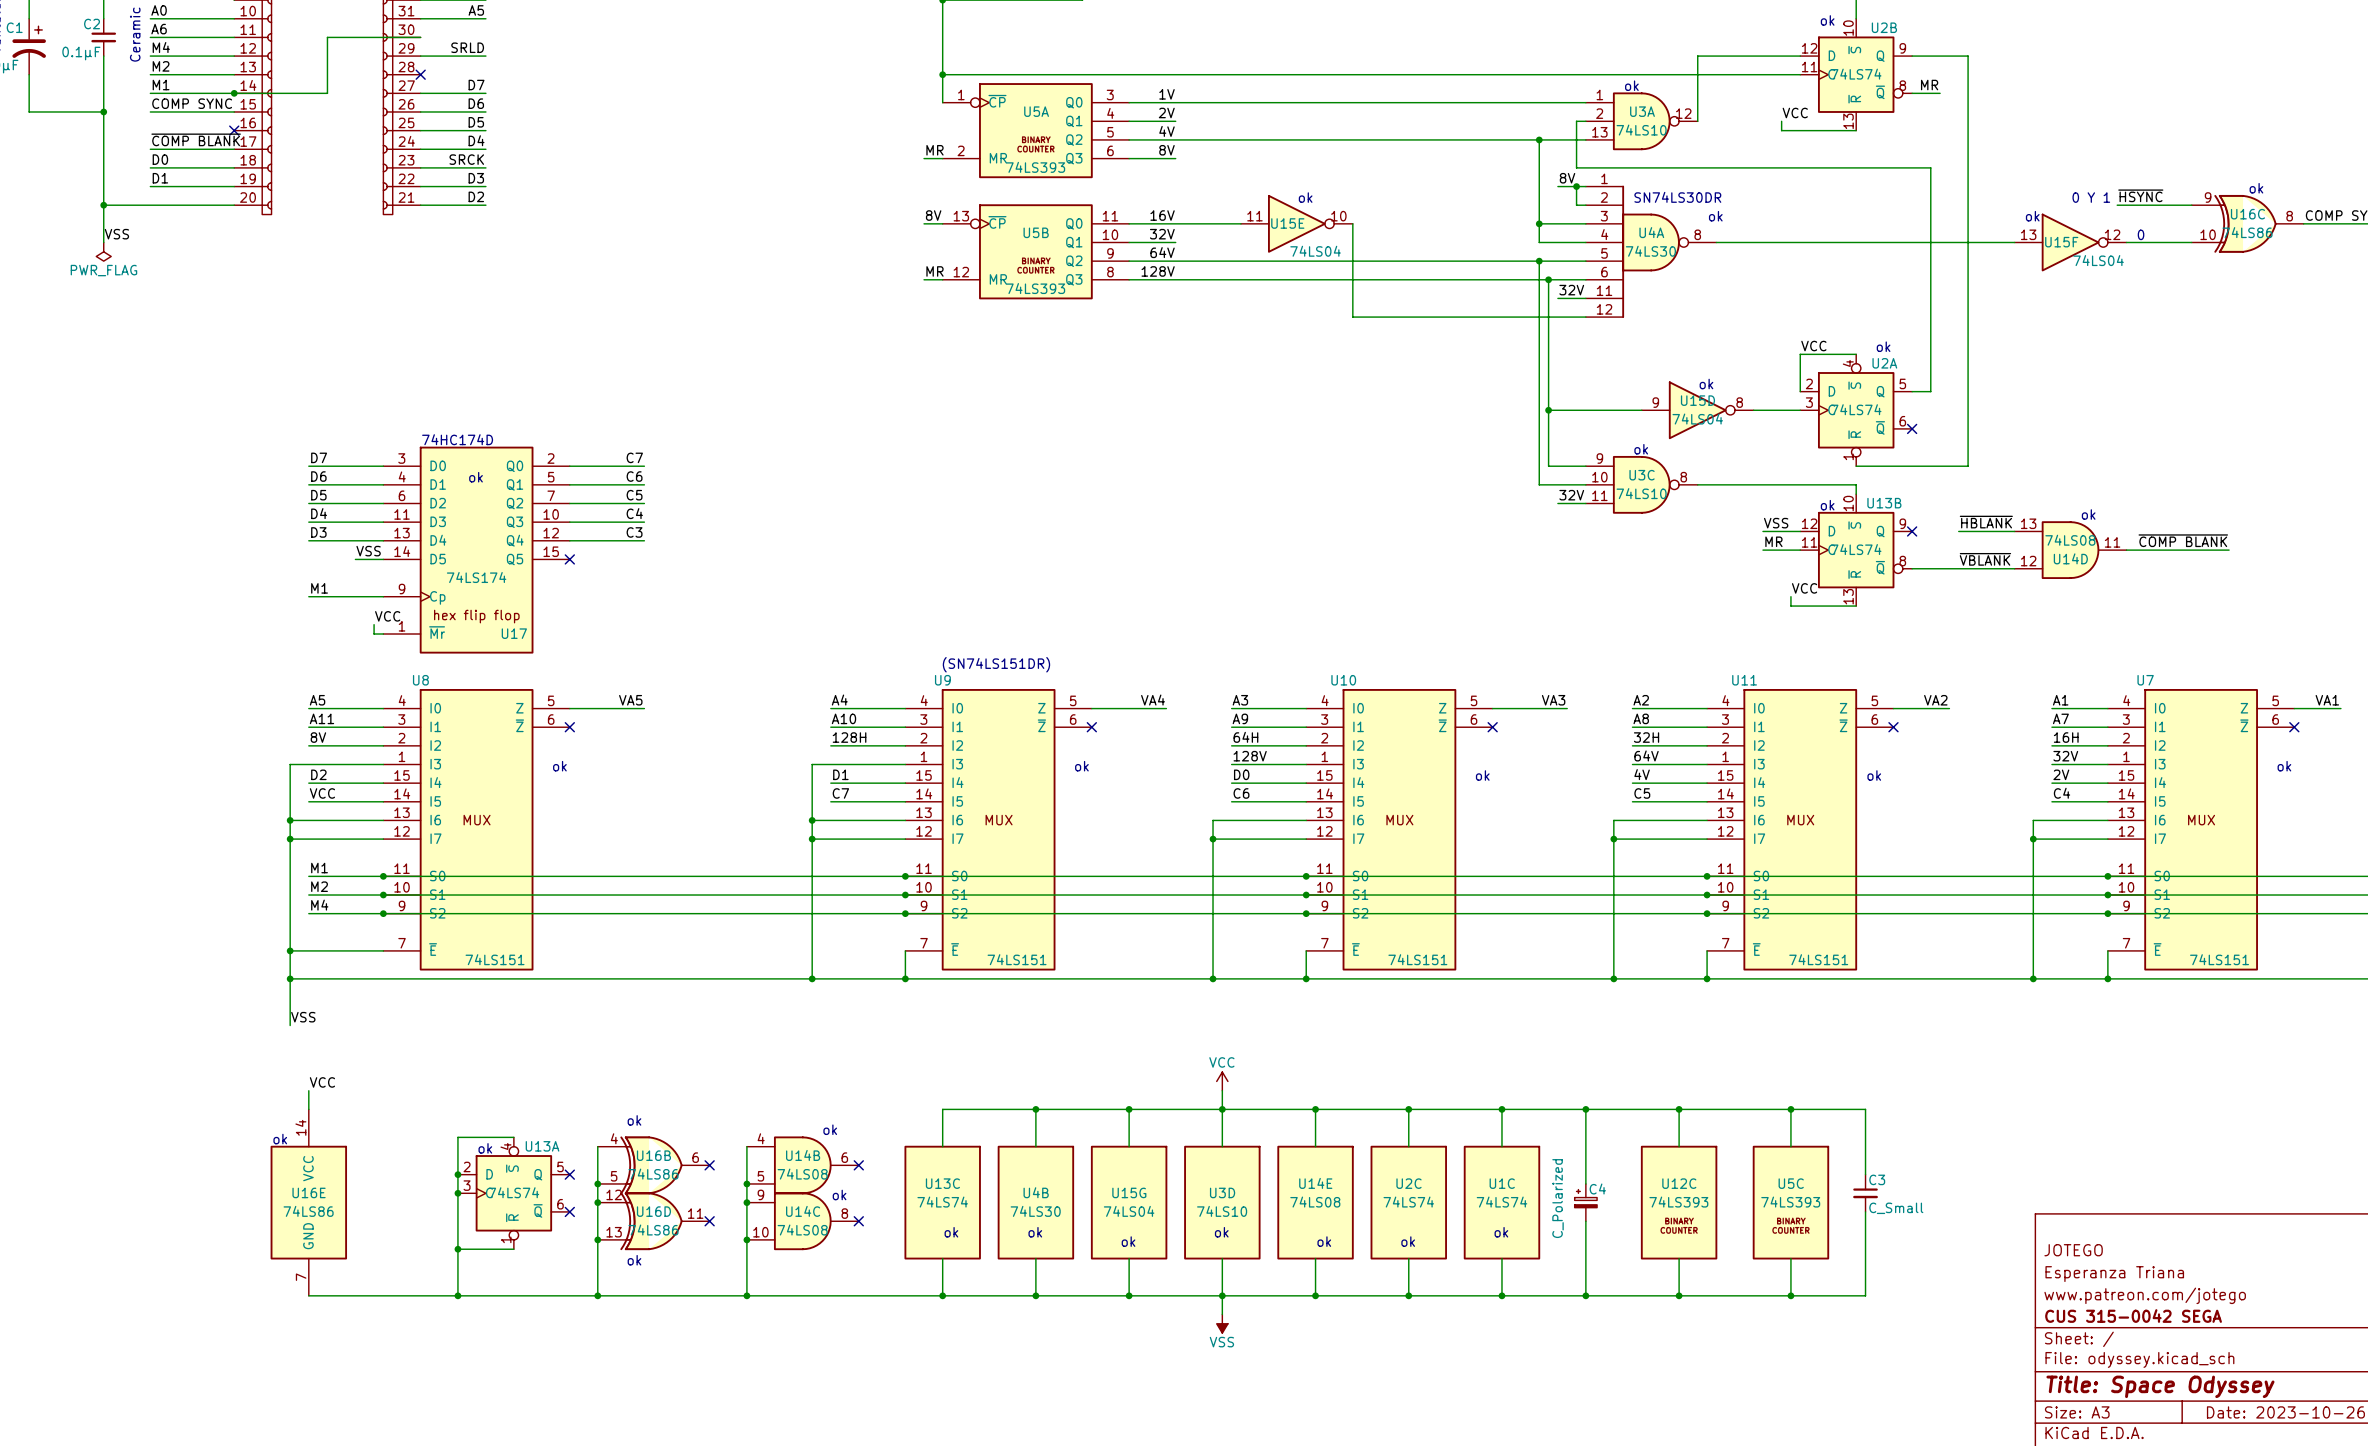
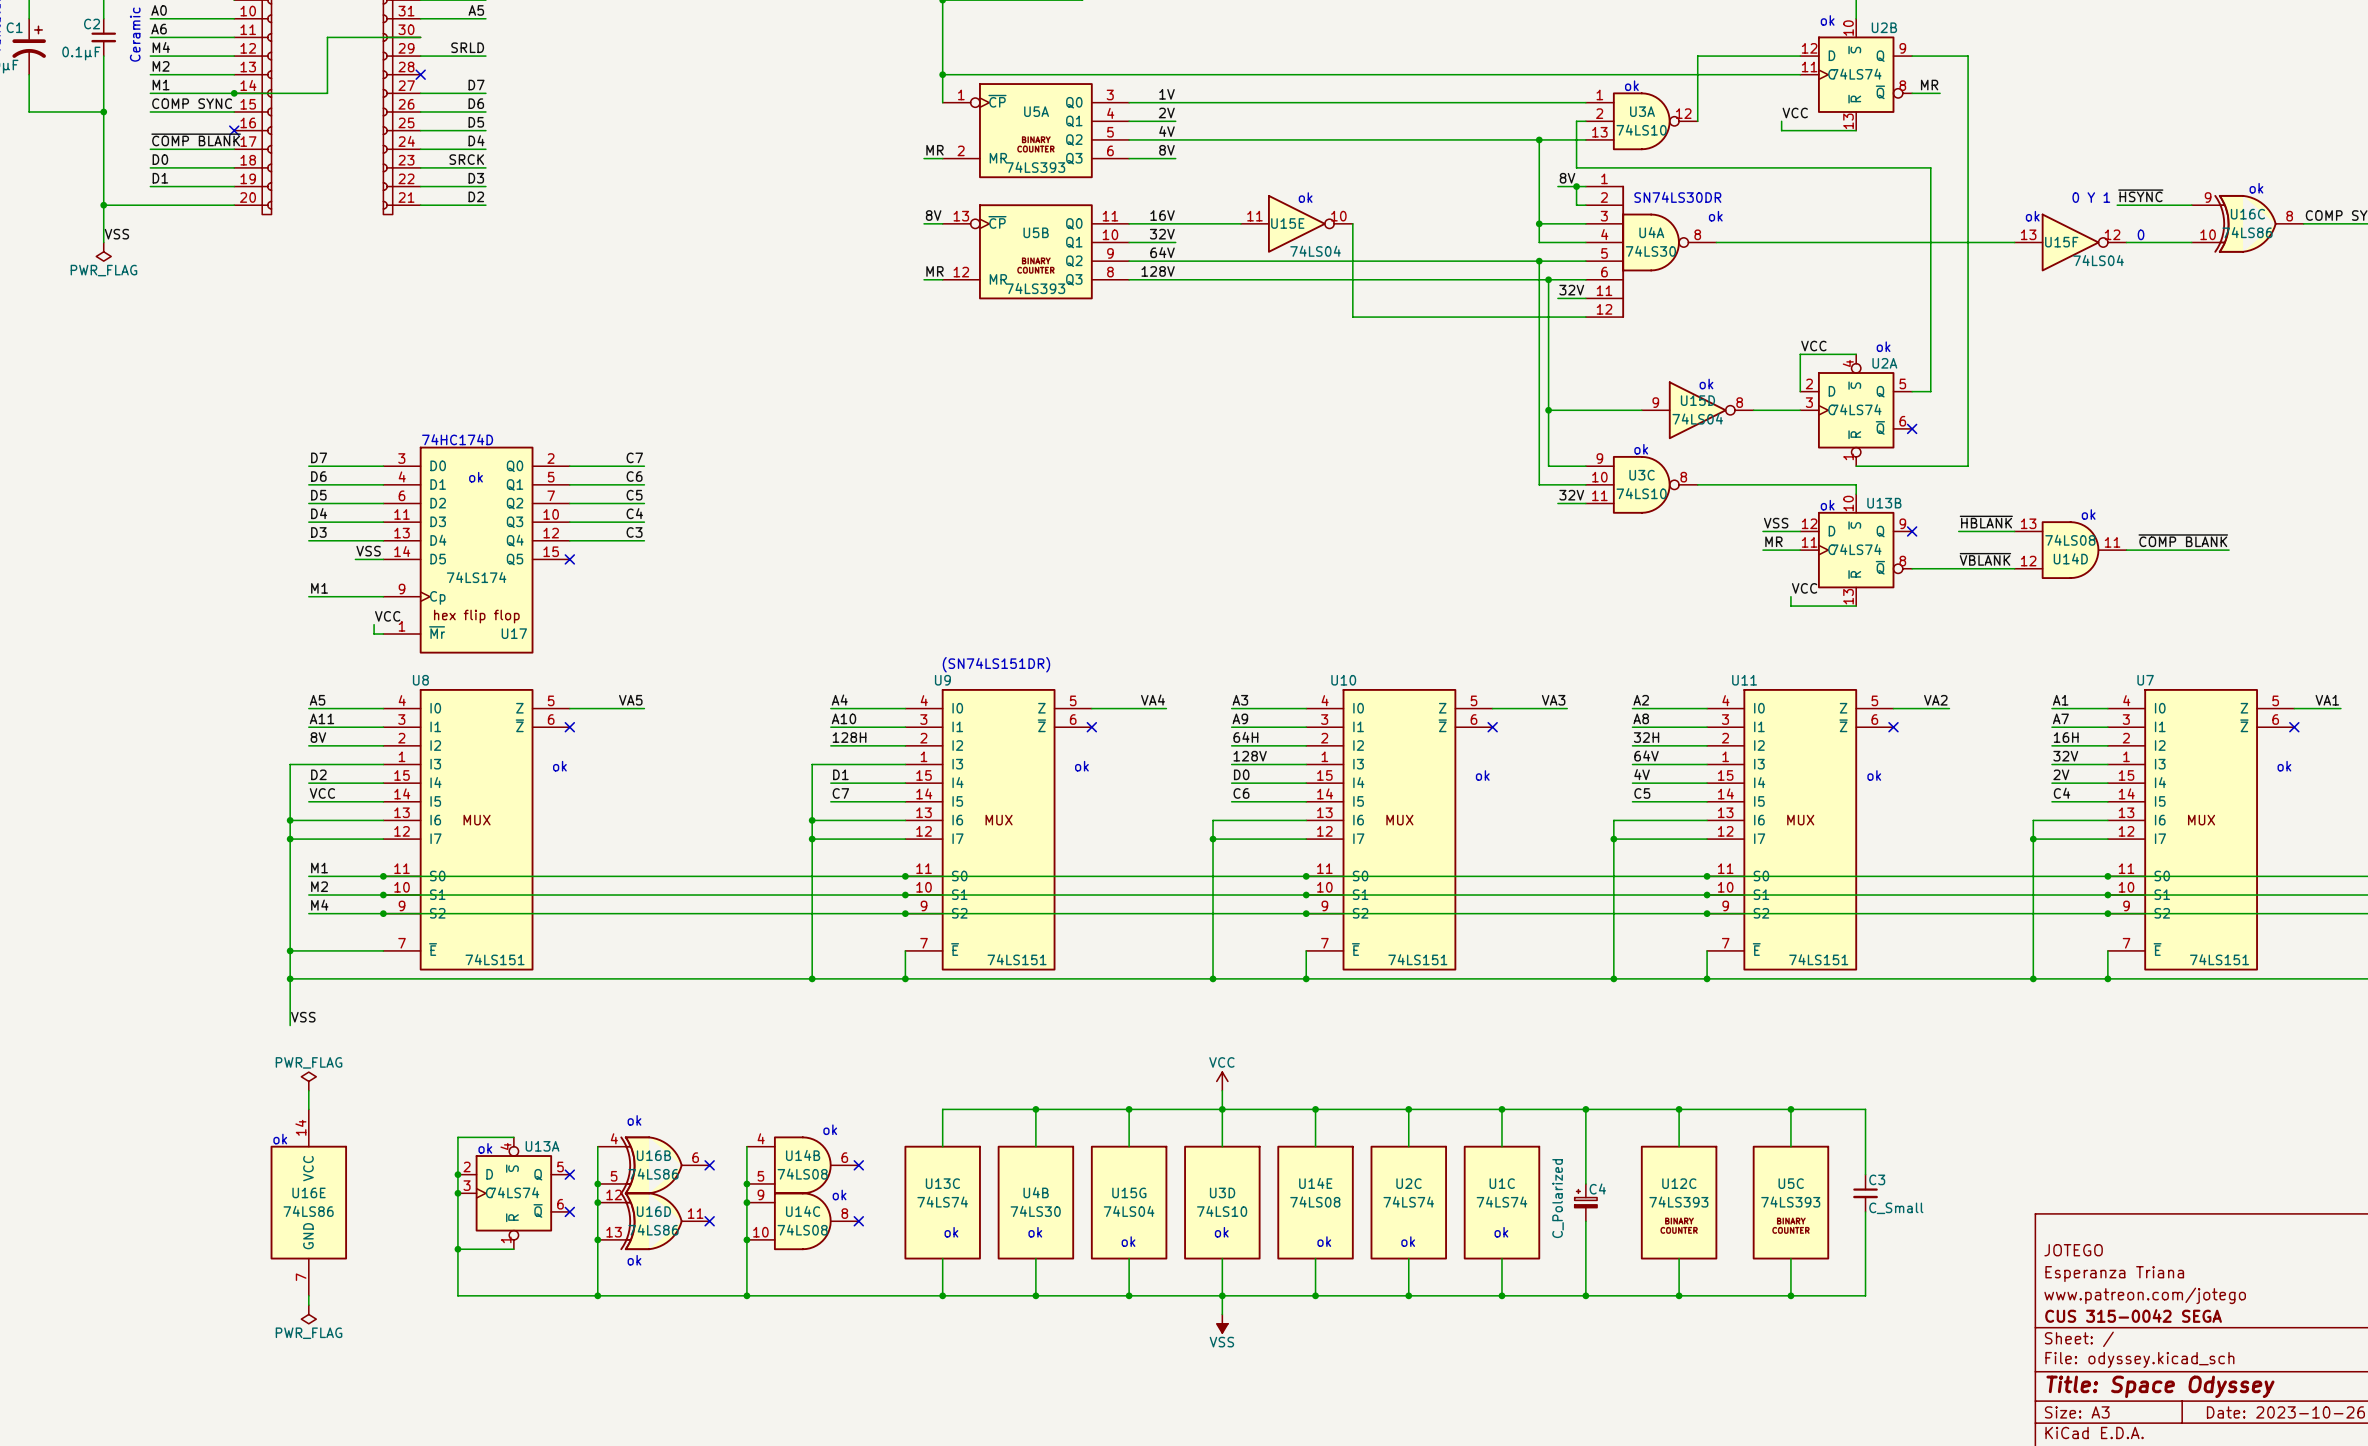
power symbol: none -> PWR_FLAG (308, 1081)
label: VCC (322, 1082) -> none
wire: (308, 1295) (457, 1295) -> (308, 1295) (308, 1305)
junction: (457, 1295) -> none
power symbol: none -> PWR_FLAG (308, 1314)

